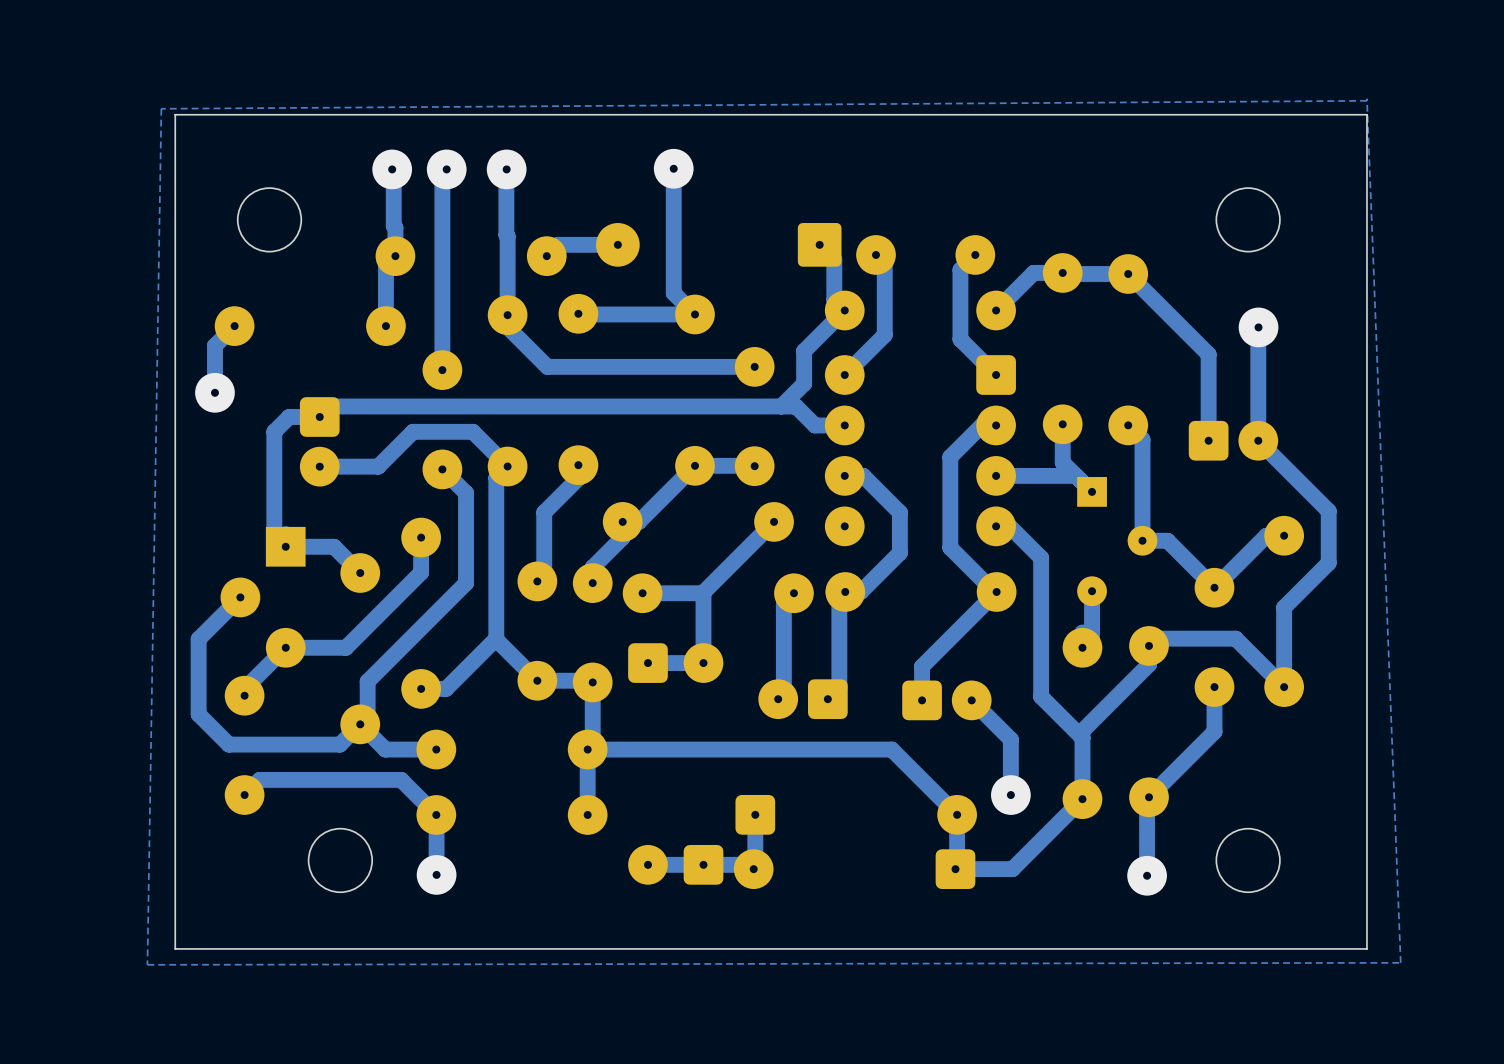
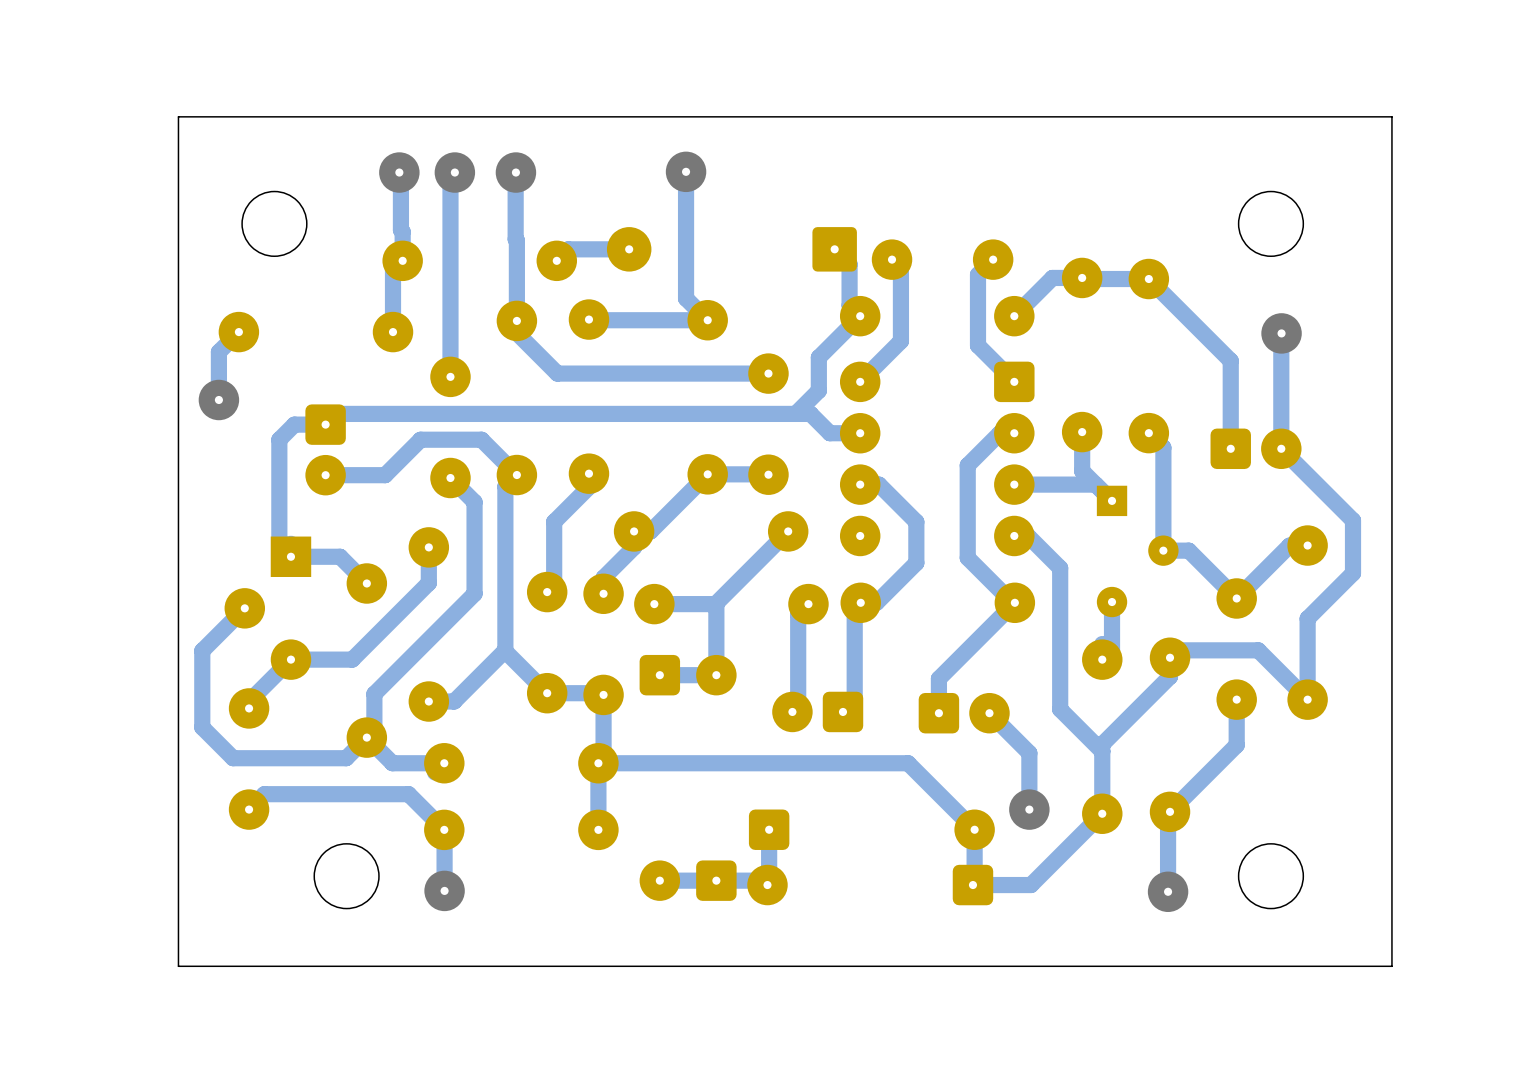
bottom zone outline: (1366, 98) (1400, 962) (147, 964) (161, 108) (1366, 100) (1366, 98) -> none

